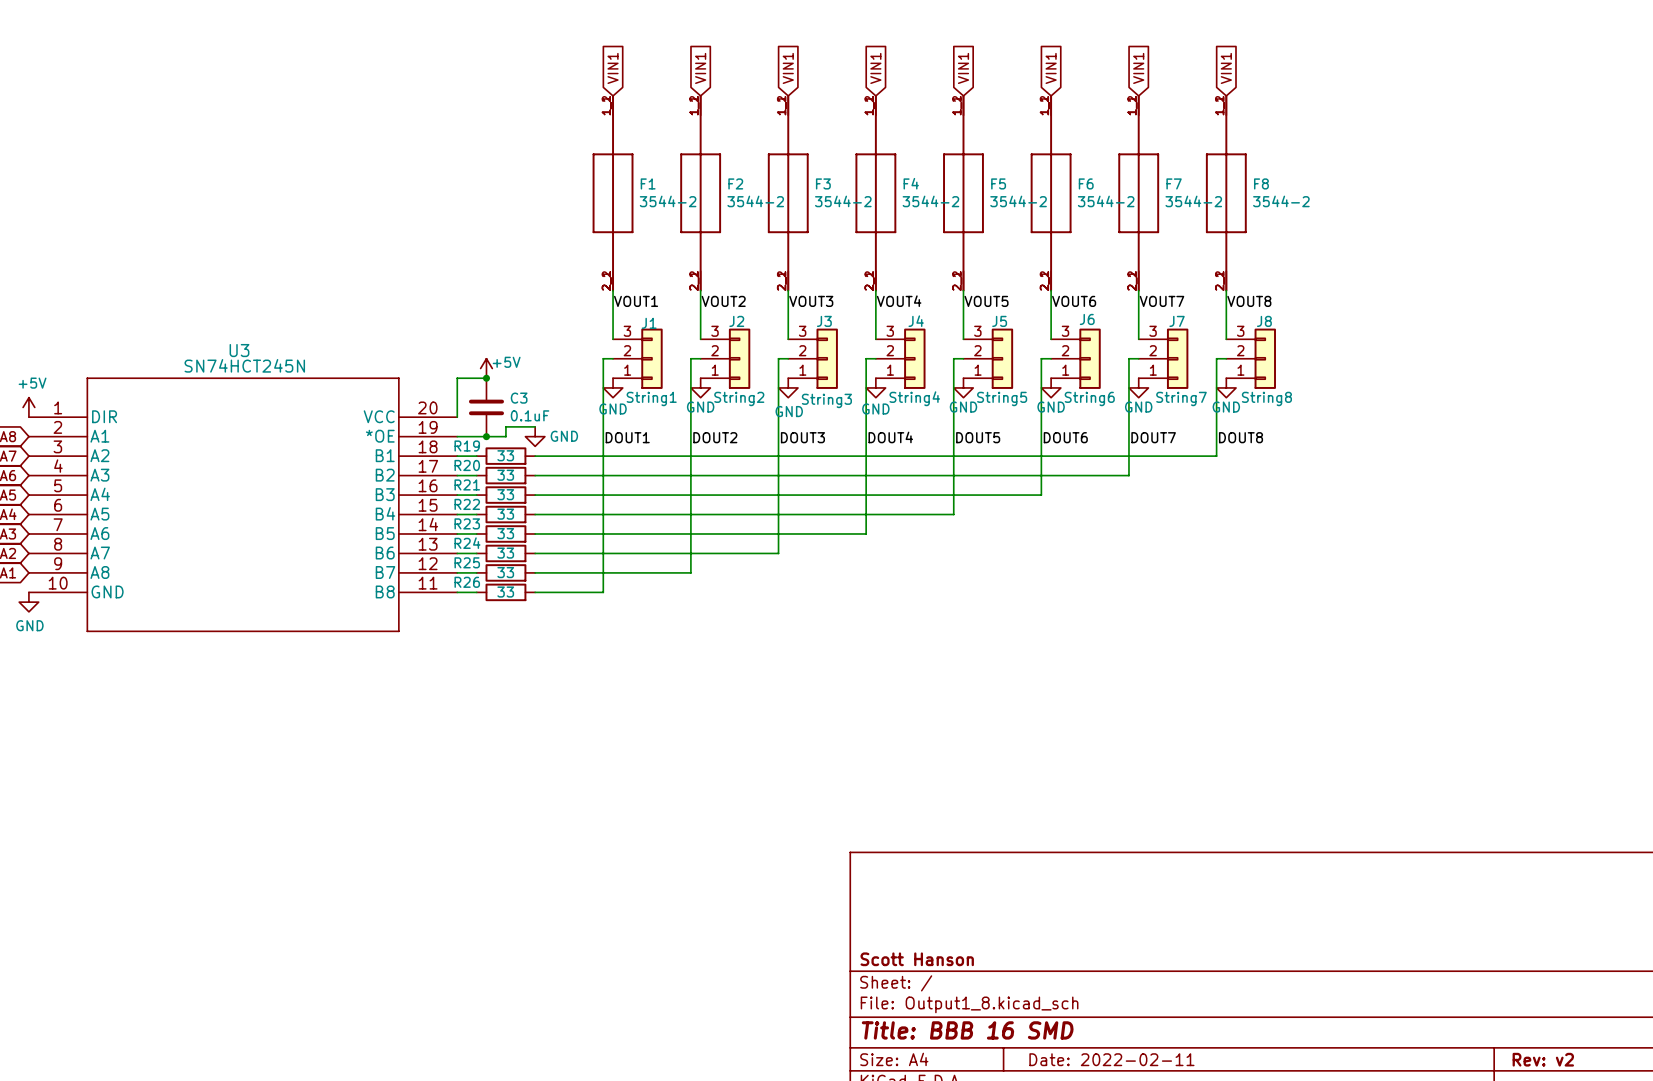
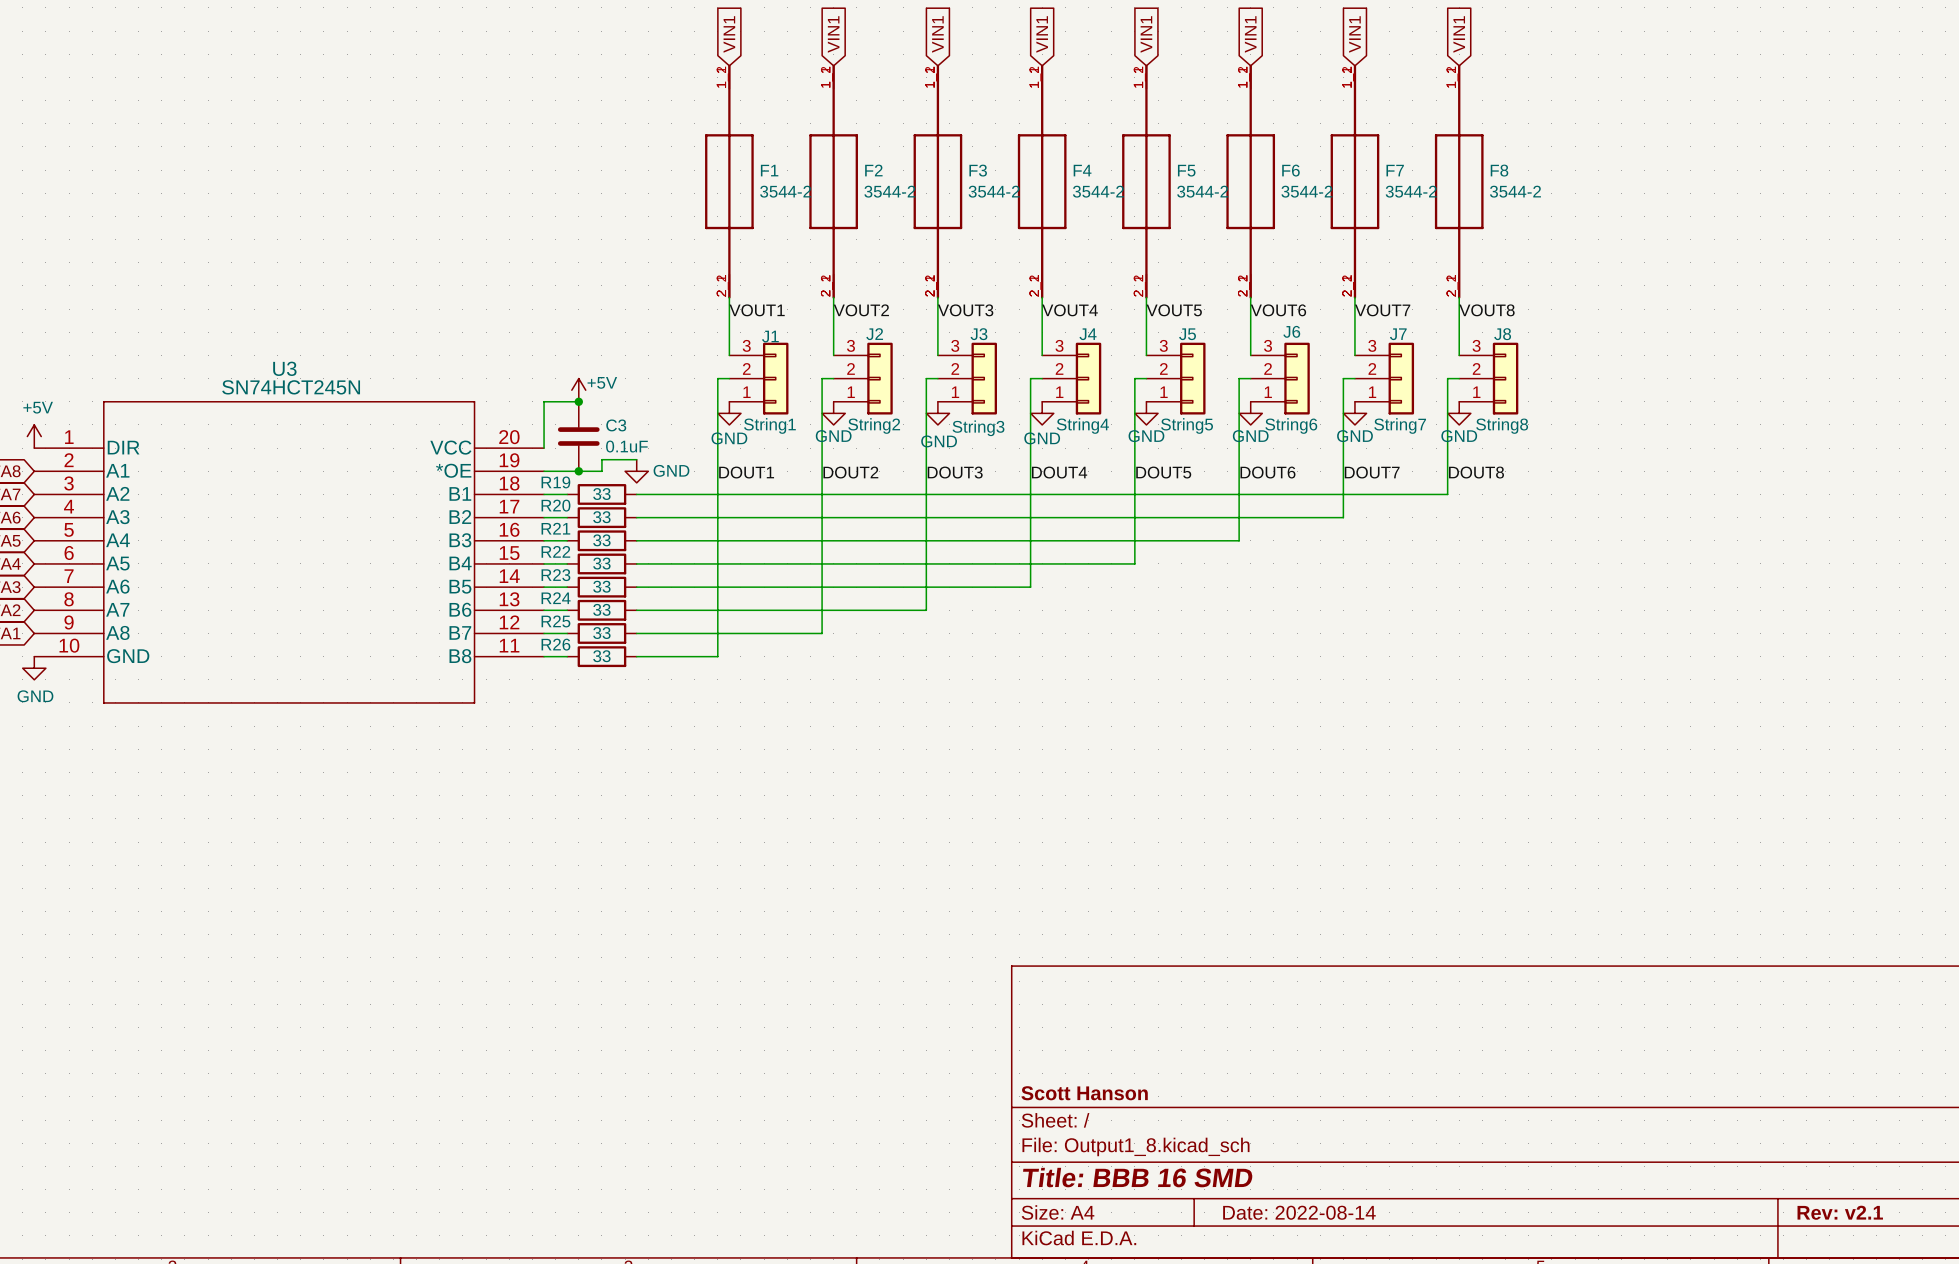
title block: Date: 2022-02-11 (1111, 1059) -> Date: 2022-08-14 (1299, 1212)
title block: Rev: v2 (1543, 1059) -> Rev: v2.1 (1840, 1212)

